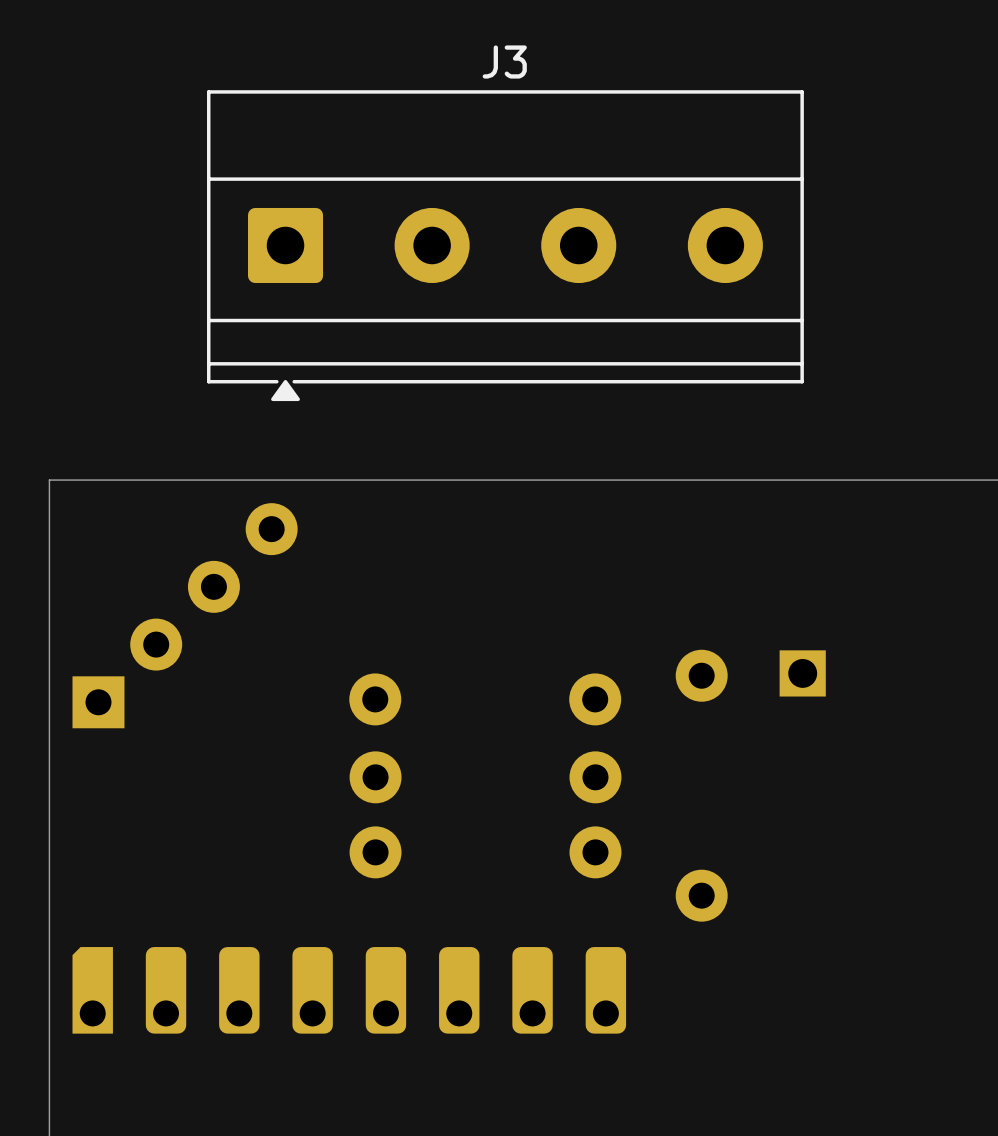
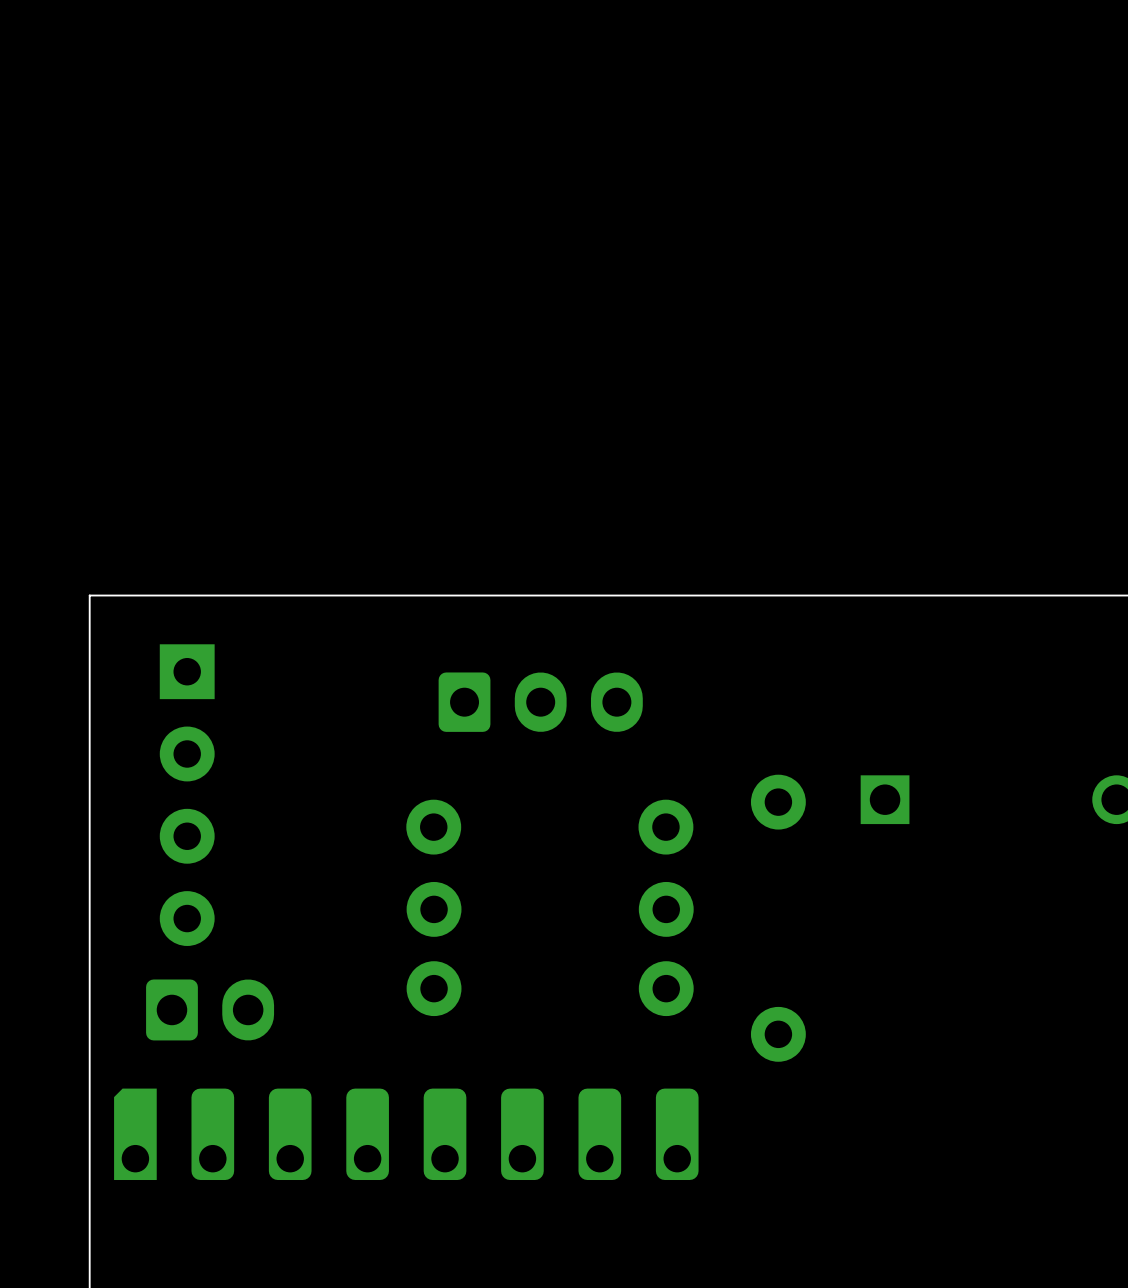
J3: (505, 245) -> none
part: none -> (540, 702)
part: (185, 615) -> none
part: none -> (187, 795)
part: none -> (210, 1009)

